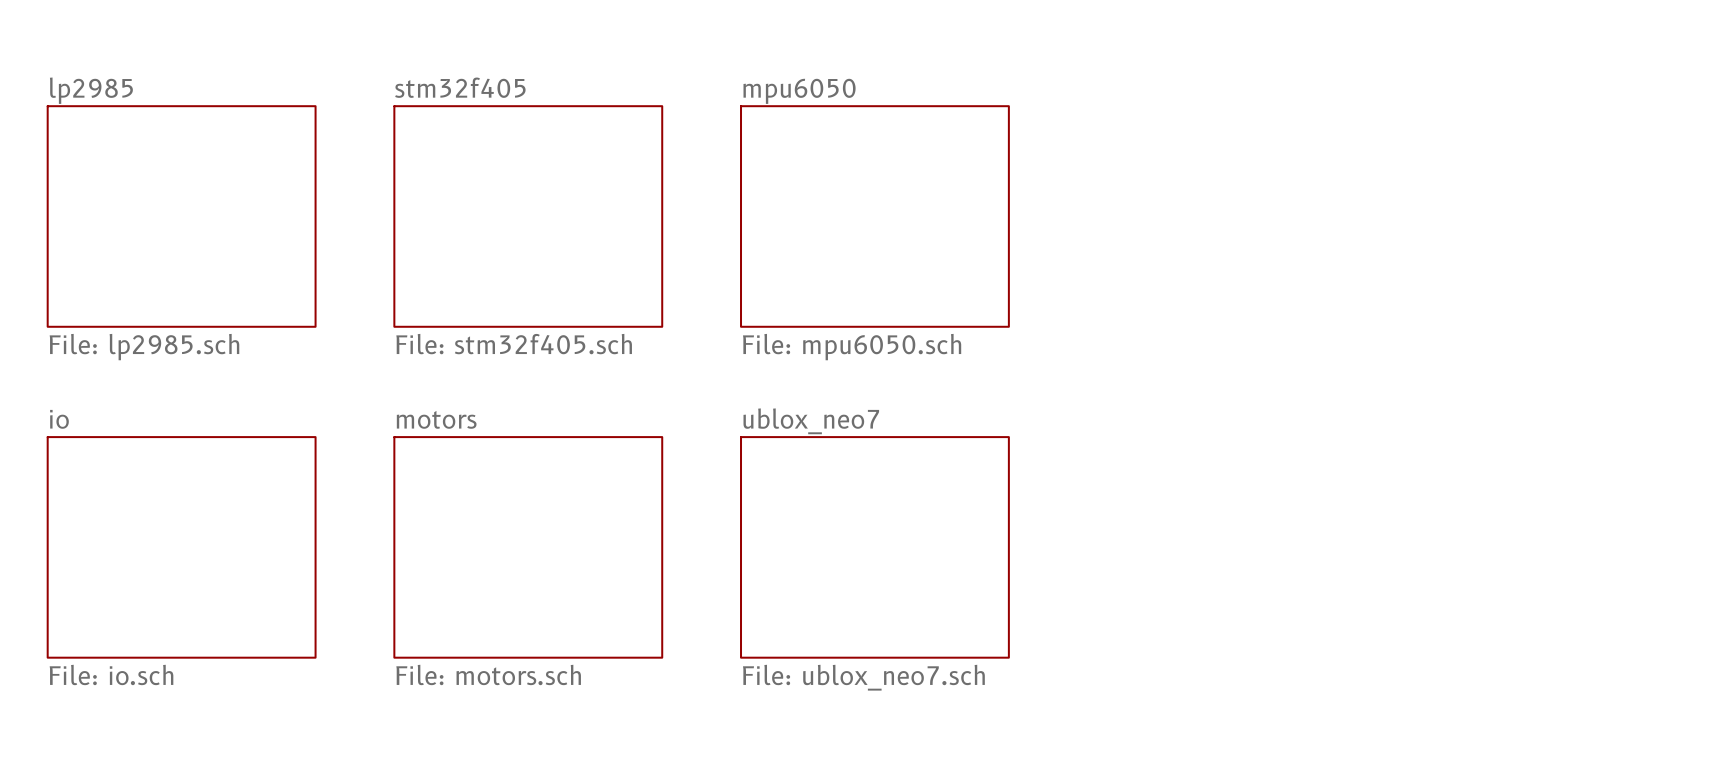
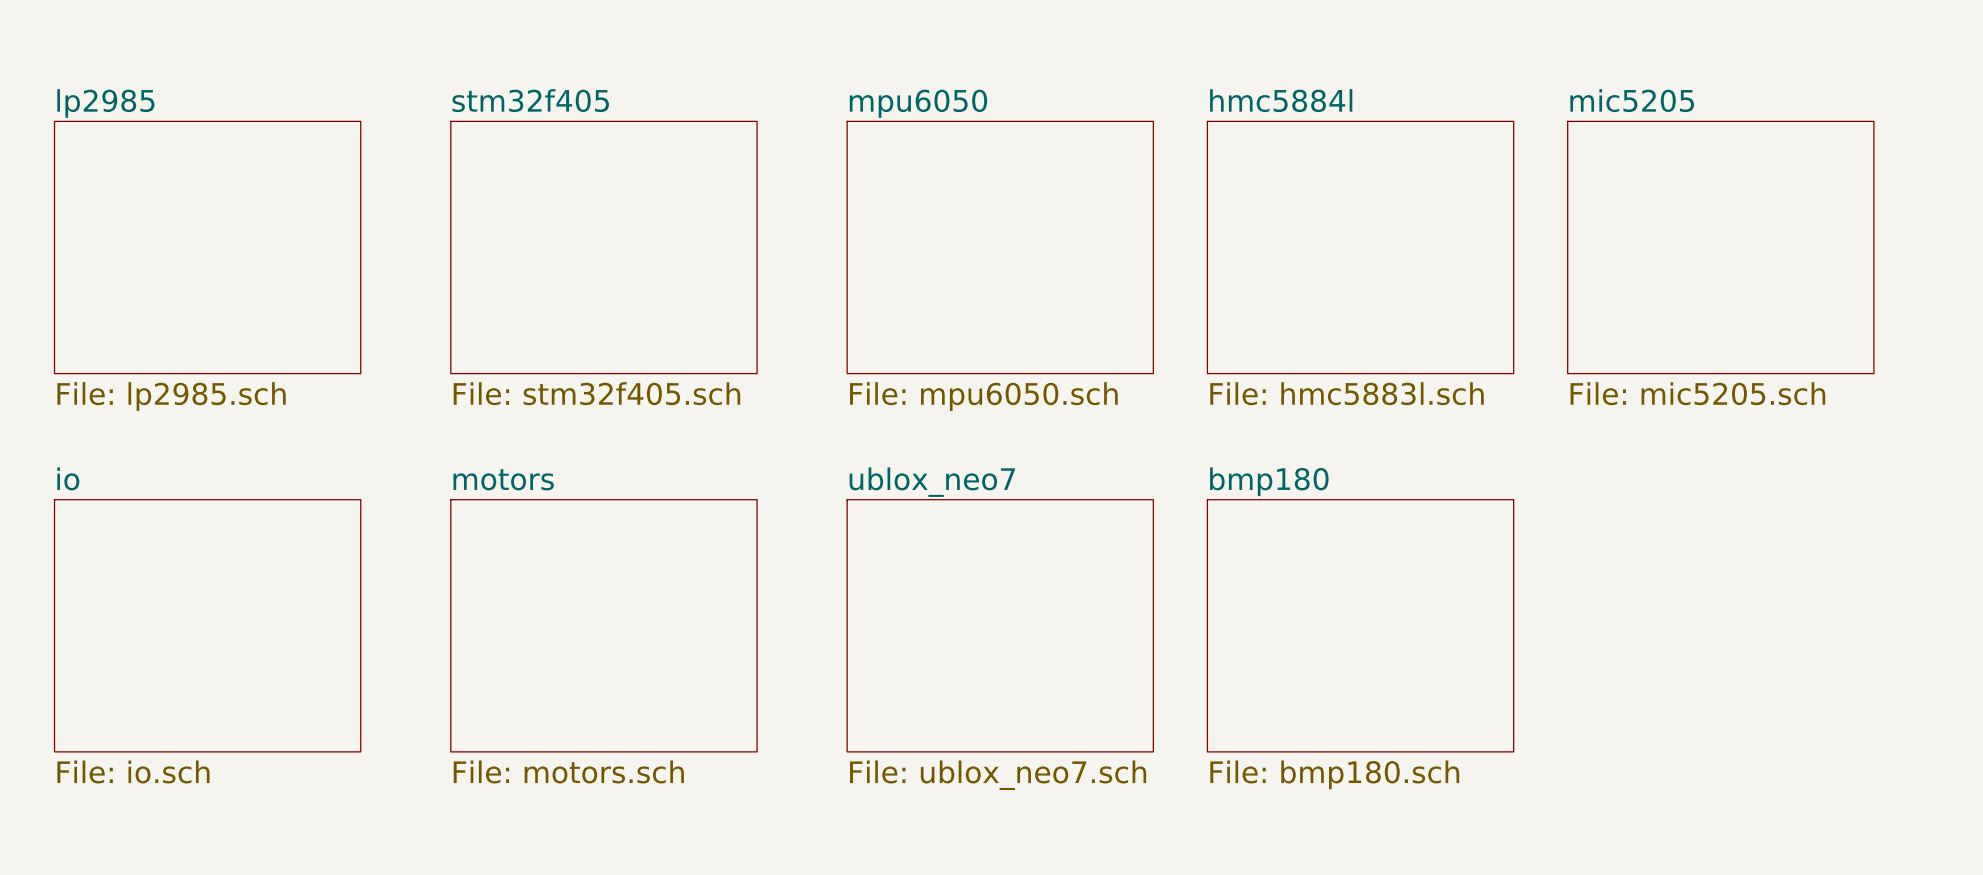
sheet hmc5884l: none -> File: hmc5883l.sch (1360, 247)
sheet mic5205: none -> File: mic5205.sch (1720, 247)
sheet bmp180: none -> File: bmp180.sch (1360, 625)

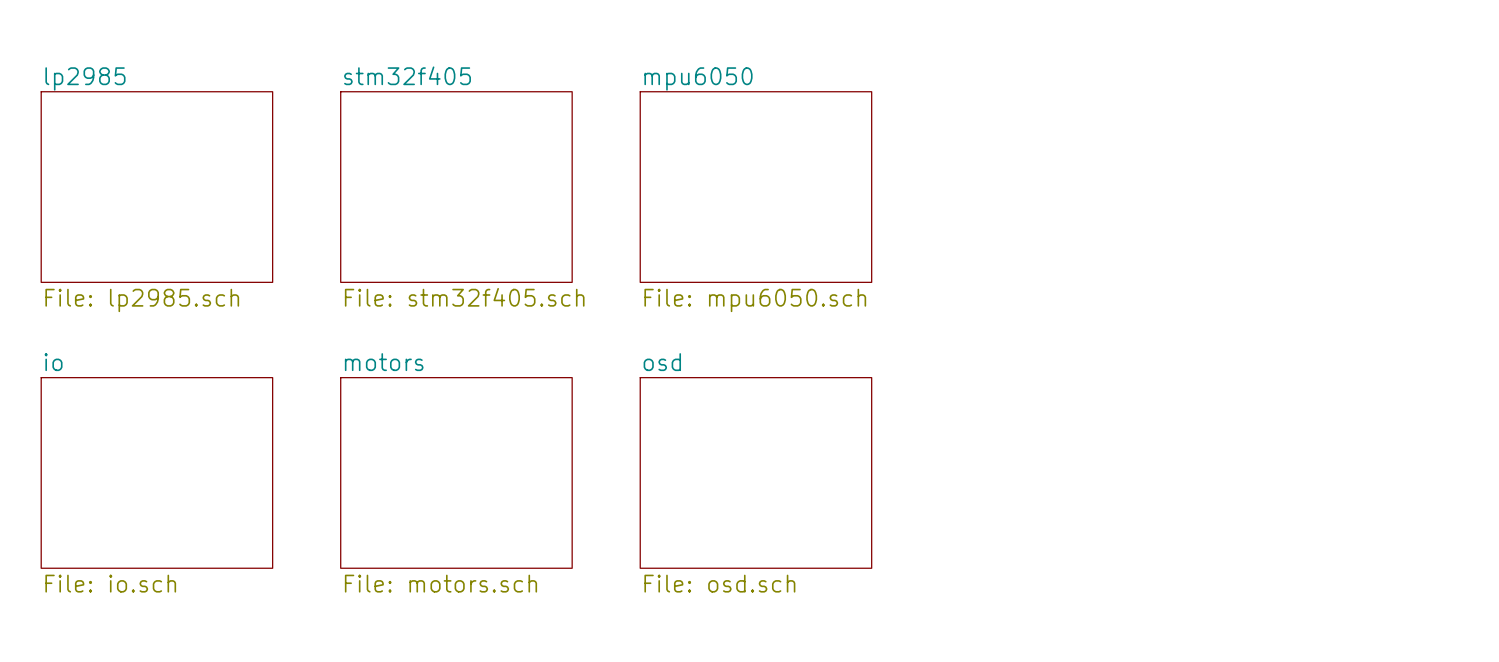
sheet hmc5884l: File: hmc5883l.sch (1360, 247) -> none
sheet mic5205: File: mic5205.sch (1720, 247) -> none
sheet ublox_neo7 name: ublox_neo7 (932, 482) -> osd (662, 362)
sheet bmp180: File: bmp180.sch (1360, 625) -> none
sheet ublox_neo7 value: File: ublox_neo7.sch (998, 775) -> File: osd.sch (719, 583)

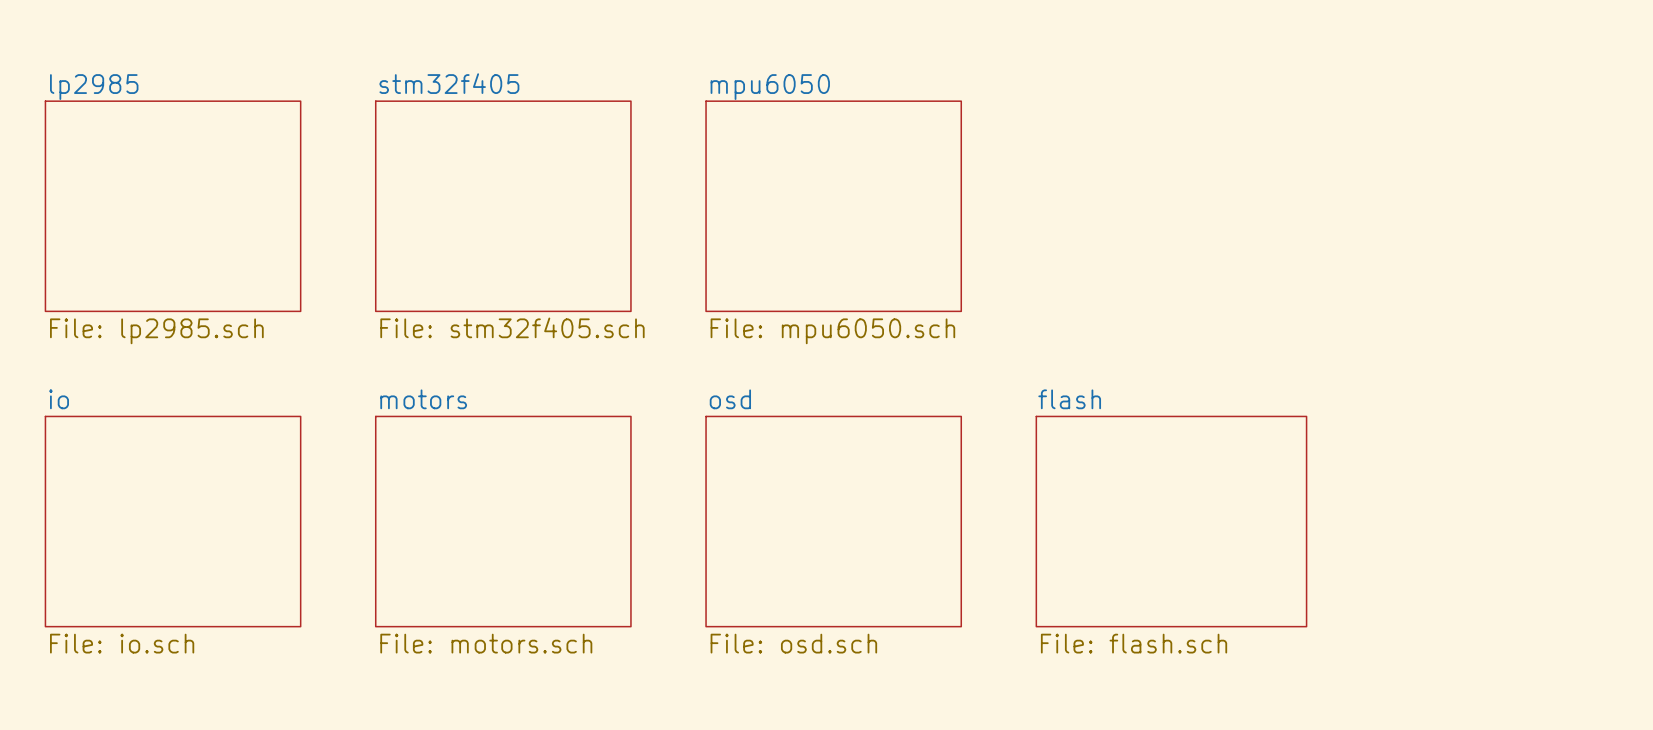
sheet flash: none -> File: flash.sch (1171, 521)

